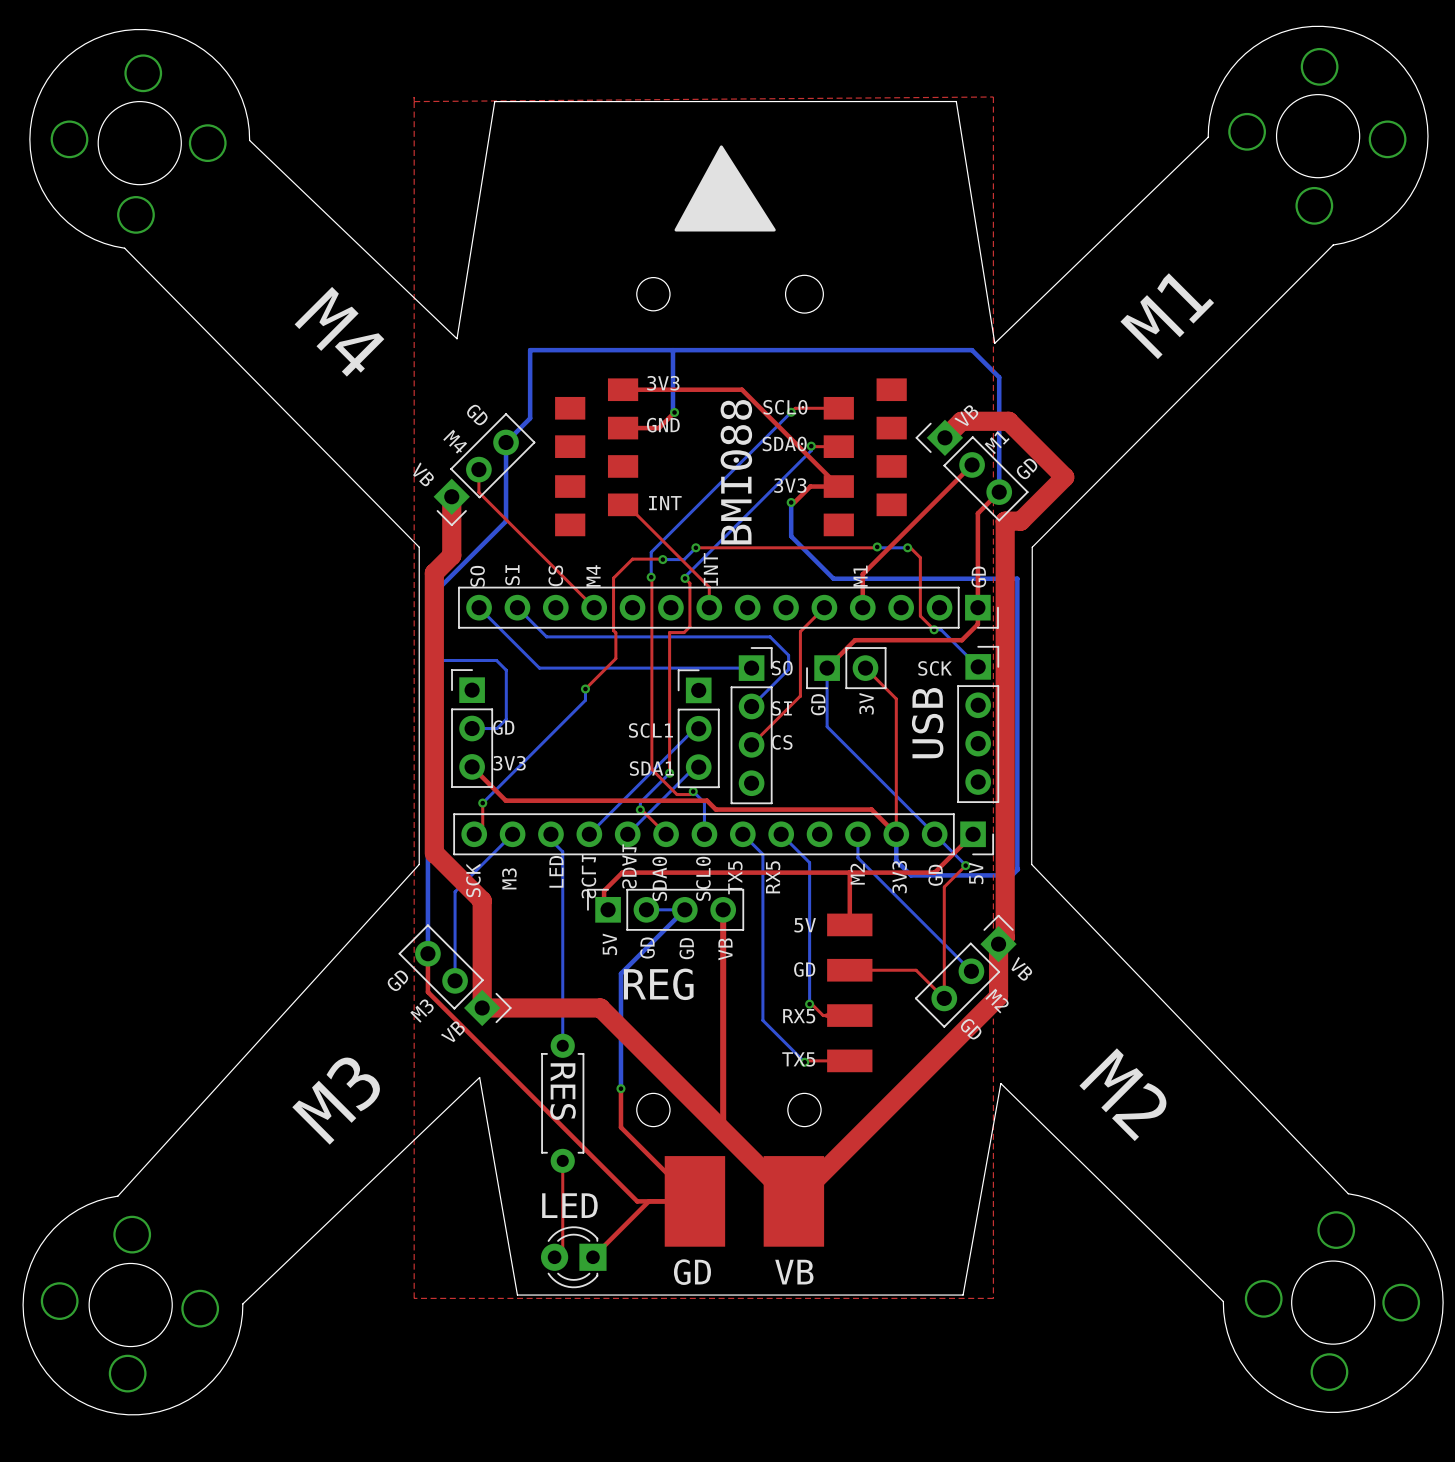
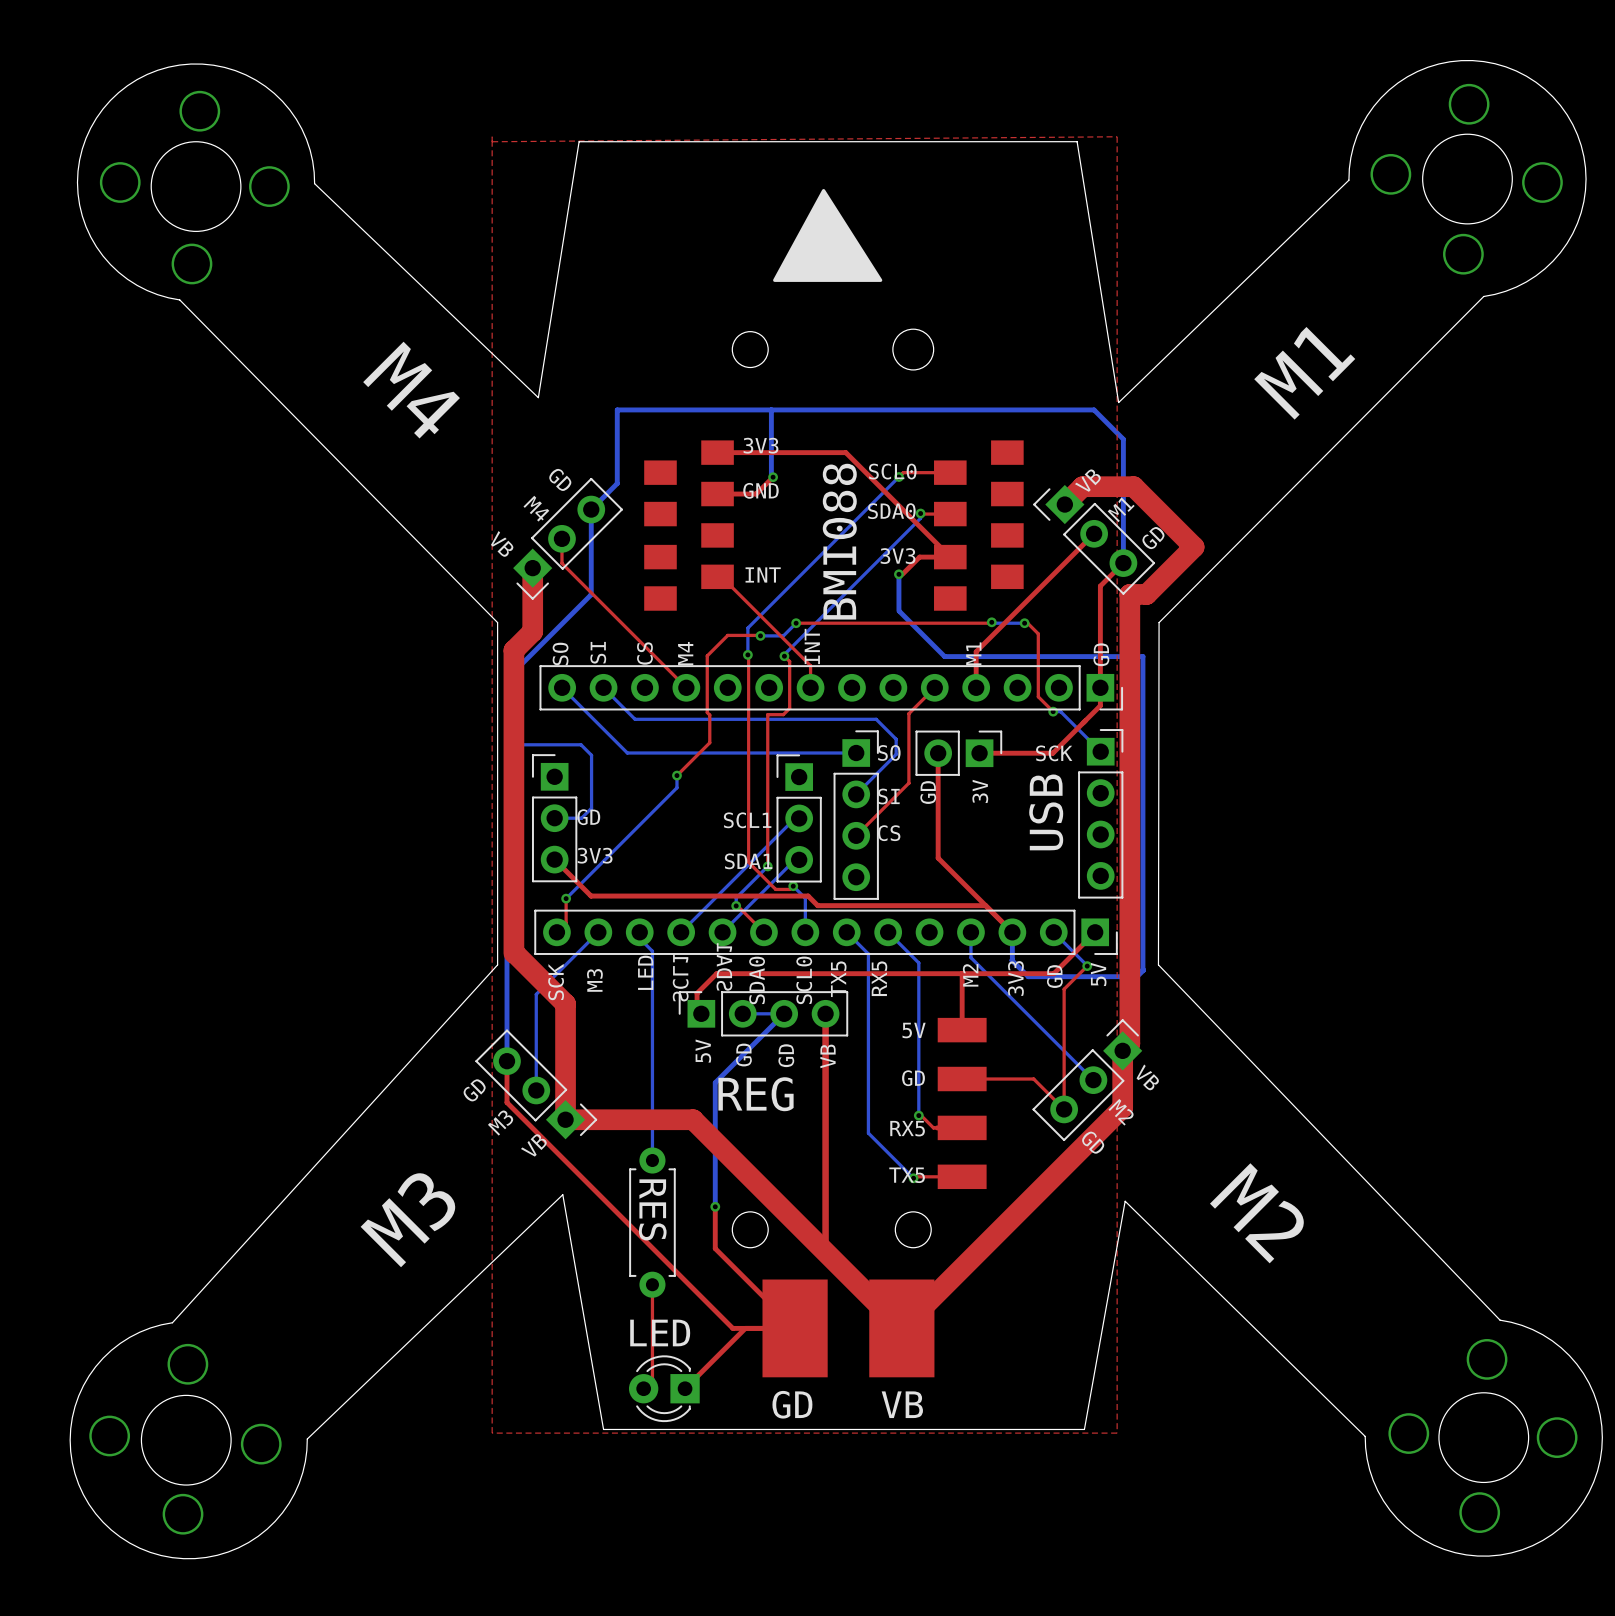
top track: (961, 640) (855, 640) (827, 668) -> (1083, 722) (1052, 753) (979, 753)
bottom track: (827, 668) (827, 726) (934, 834) -> none
part rotation: 0° (846, 668) -> 180° (958, 753)
top track: (865, 668) (896, 698) (896, 834) -> (938, 753) (938, 858) (1012, 932)

